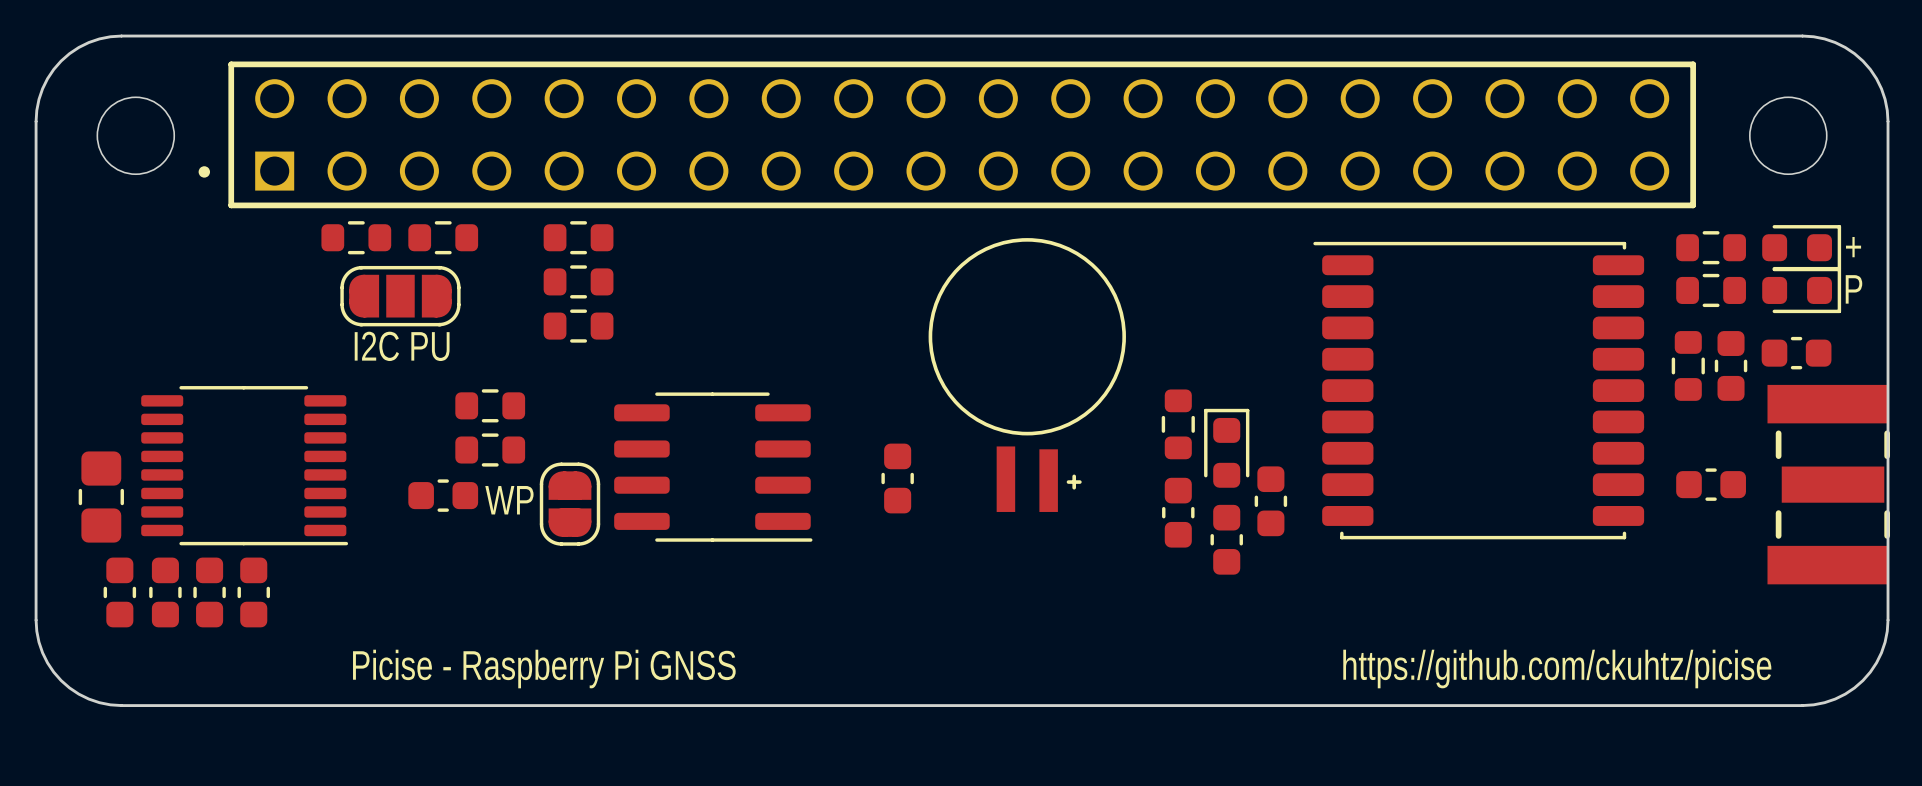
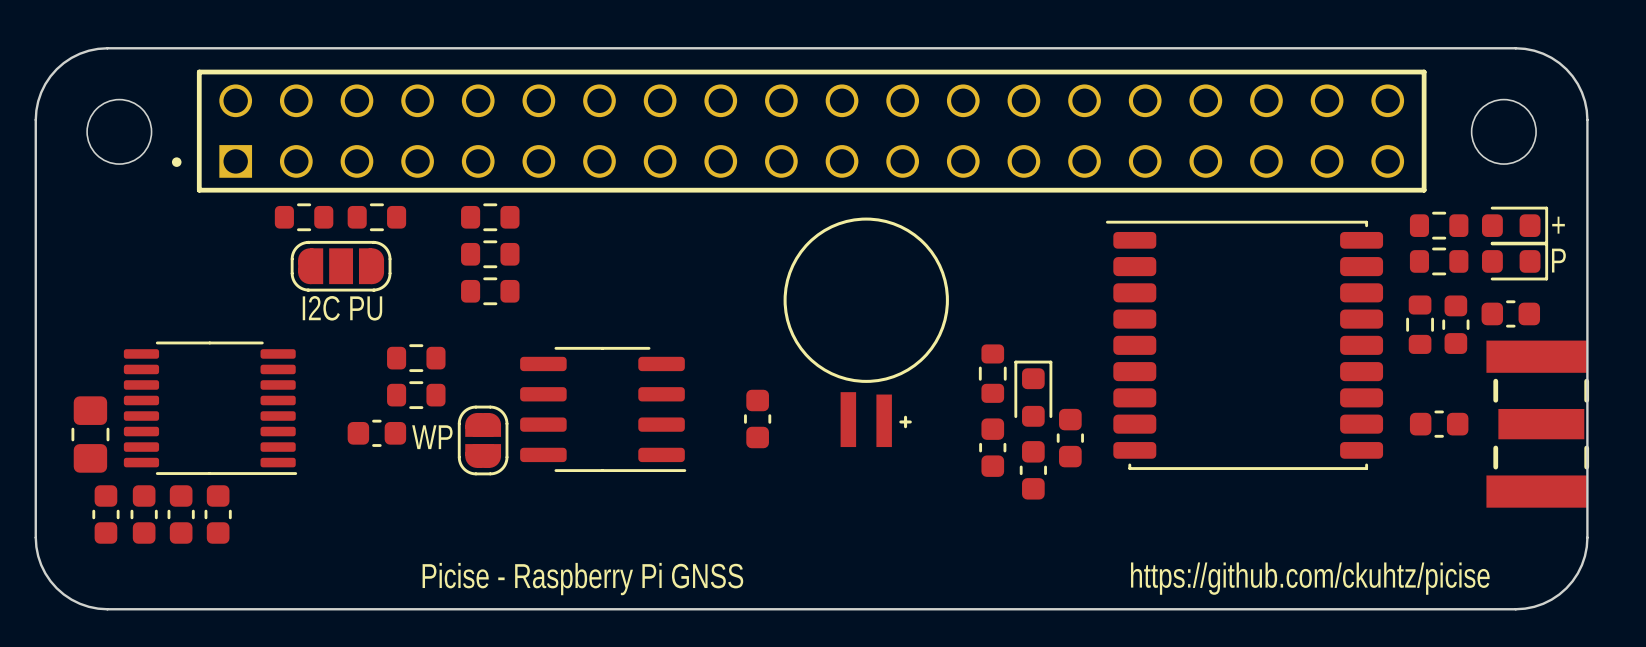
text position: Picise - Raspberry Pi GNSS (544, 669) -> Picise - Raspberry Pi GNSS (582, 579)

